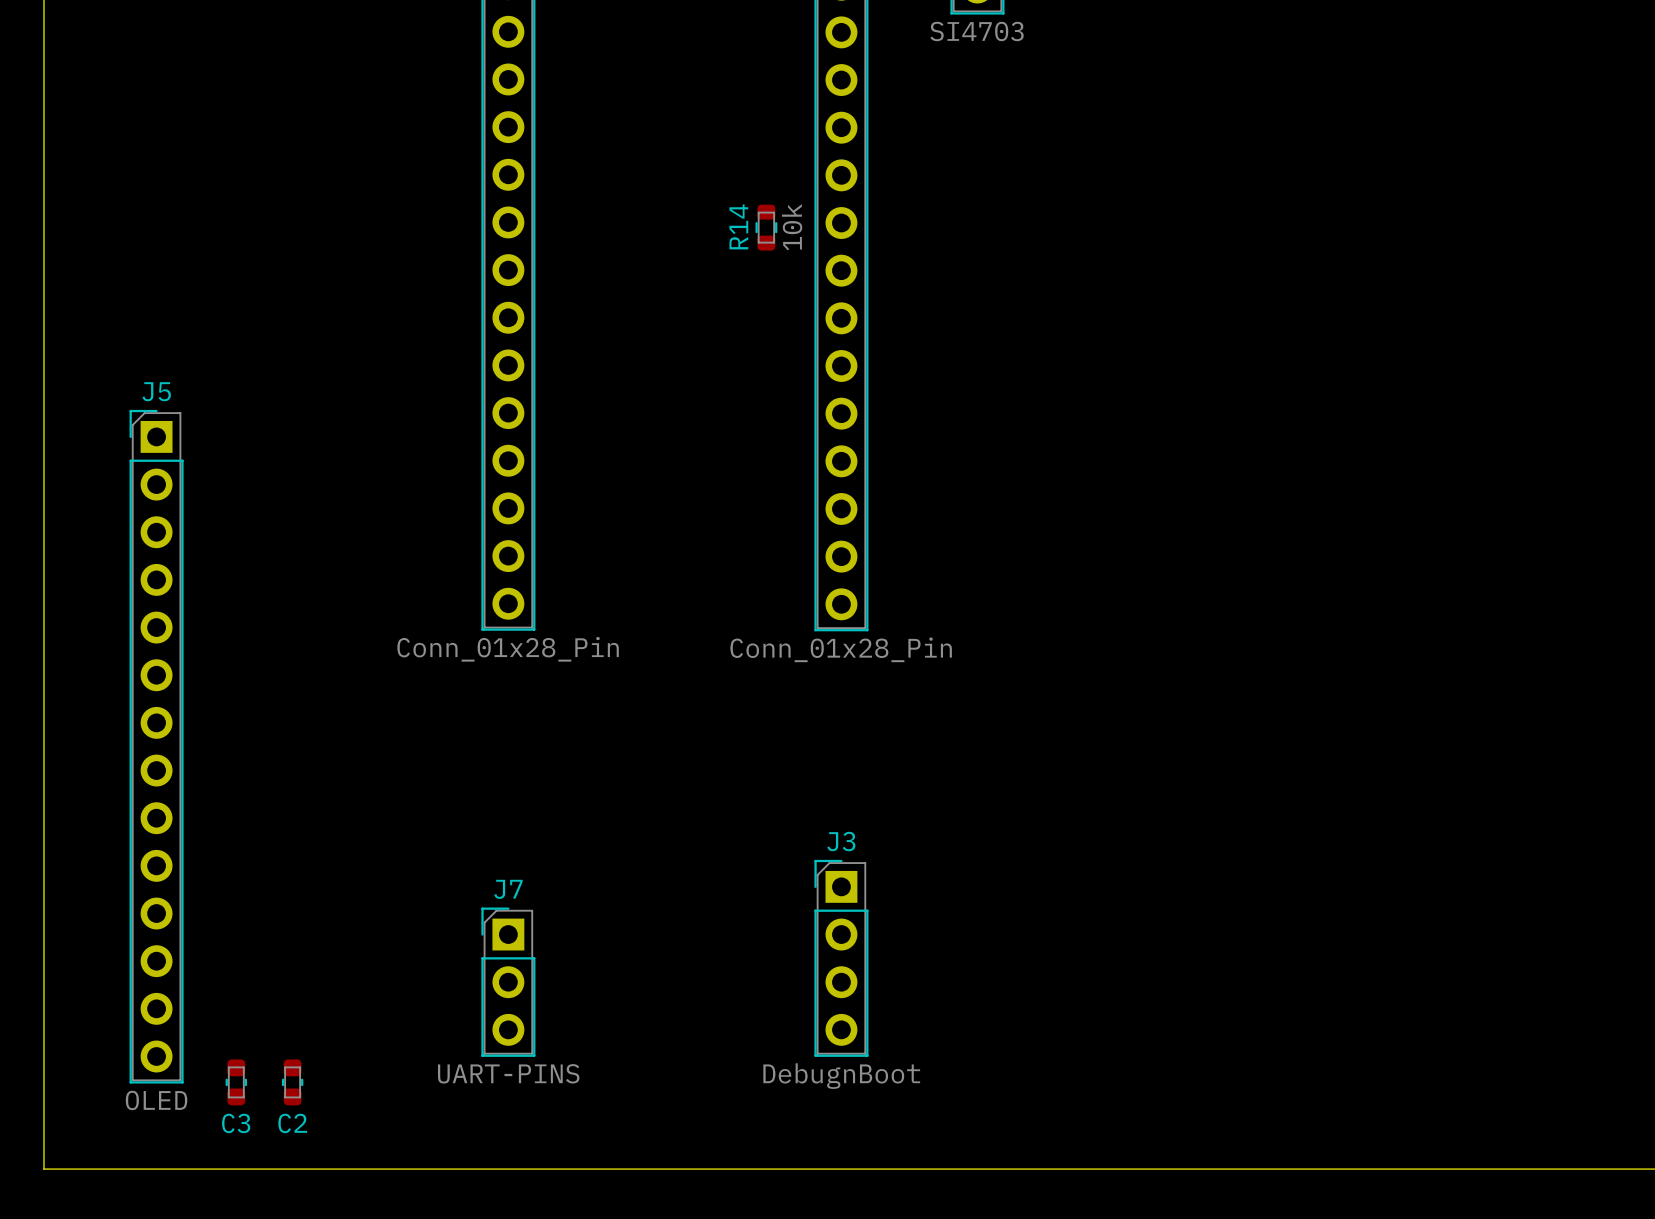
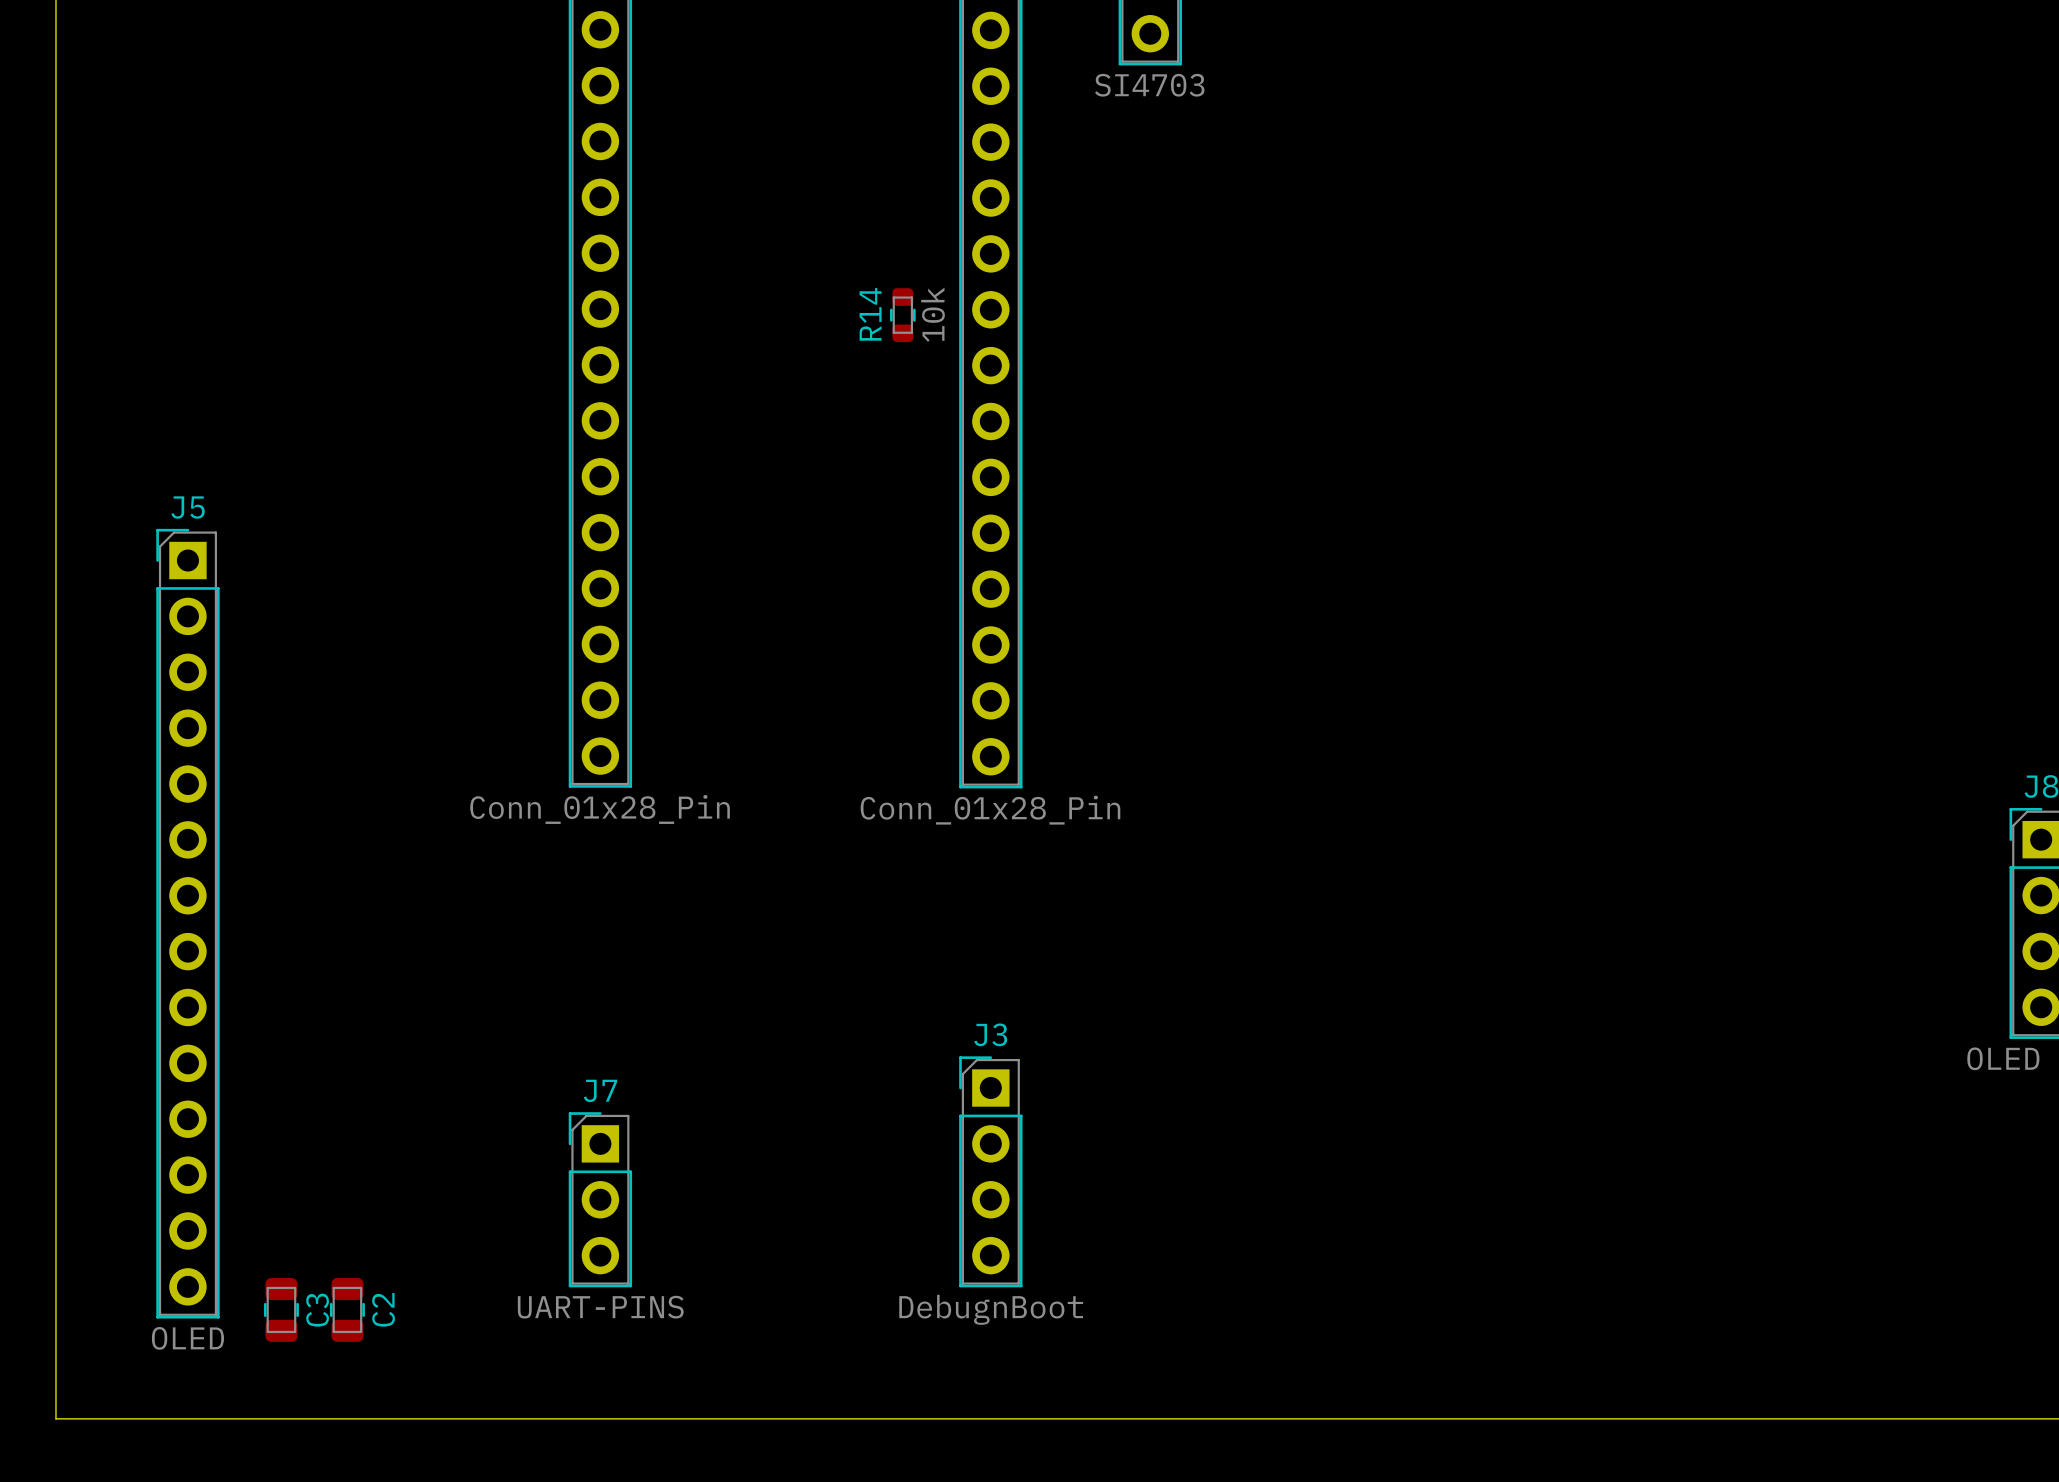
C3 footprint: [225, 1059, 248, 1106] -> [263, 1278, 299, 1342]
C2 footprint: [281, 1059, 304, 1106] -> [329, 1278, 365, 1342]
C3 name rotation: 0° (236, 1123) -> 90° counterclockwise (317, 1310)
C3 name position: C3 (236, 1123) -> C3 (317, 1310)
C2 name rotation: 0° (292, 1123) -> 90° counterclockwise (383, 1309)
C2 name position: C2 (292, 1123) -> C2 (383, 1309)

